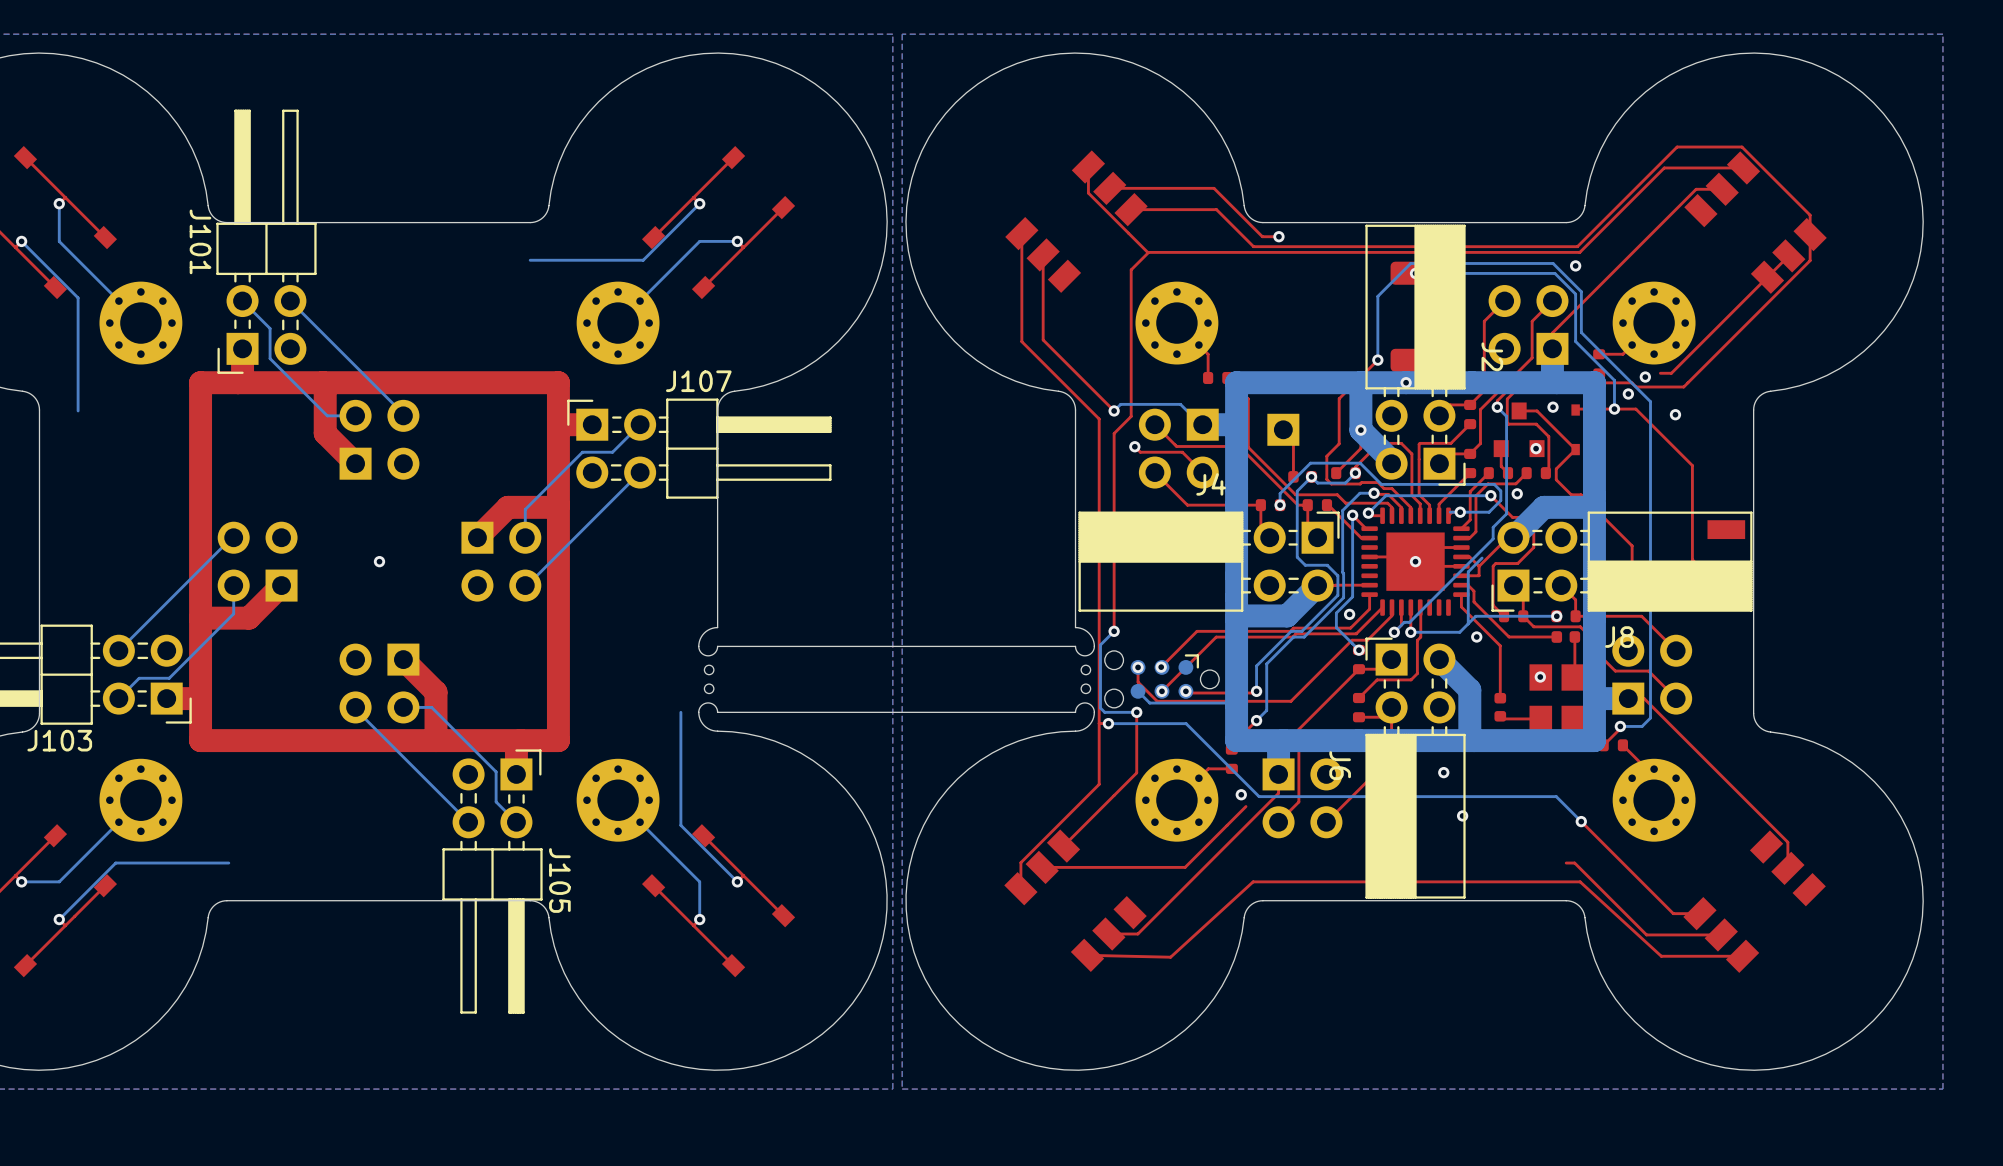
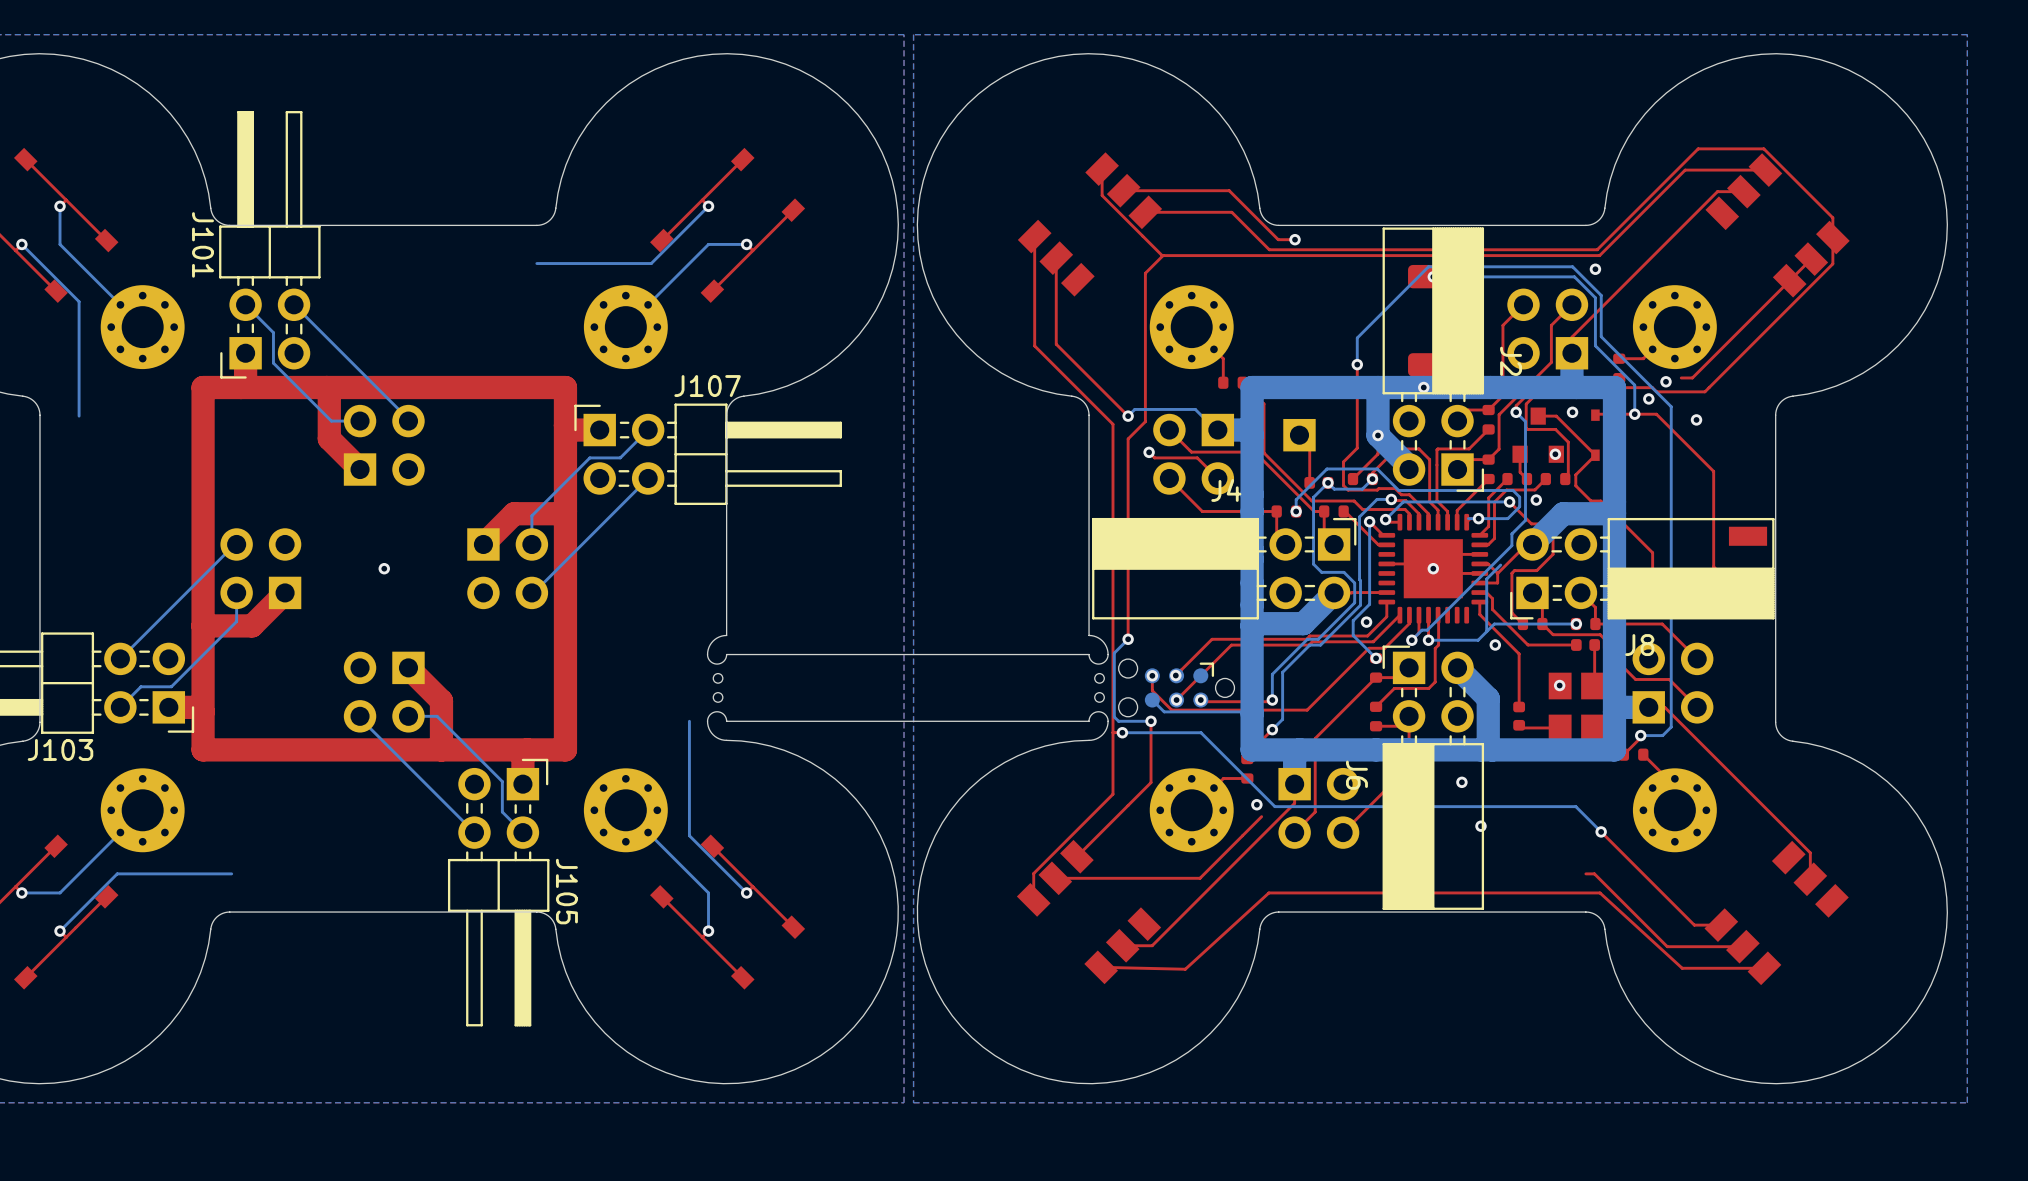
bottom track: (1377, 296) (1377, 360) -> (1395, 300) (1357, 337) (1357, 364)
top track: (1377, 360) (1339, 398) (1339, 443) -> (1357, 364) (1356, 449)
via position: (1377, 360) -> (1357, 364)

